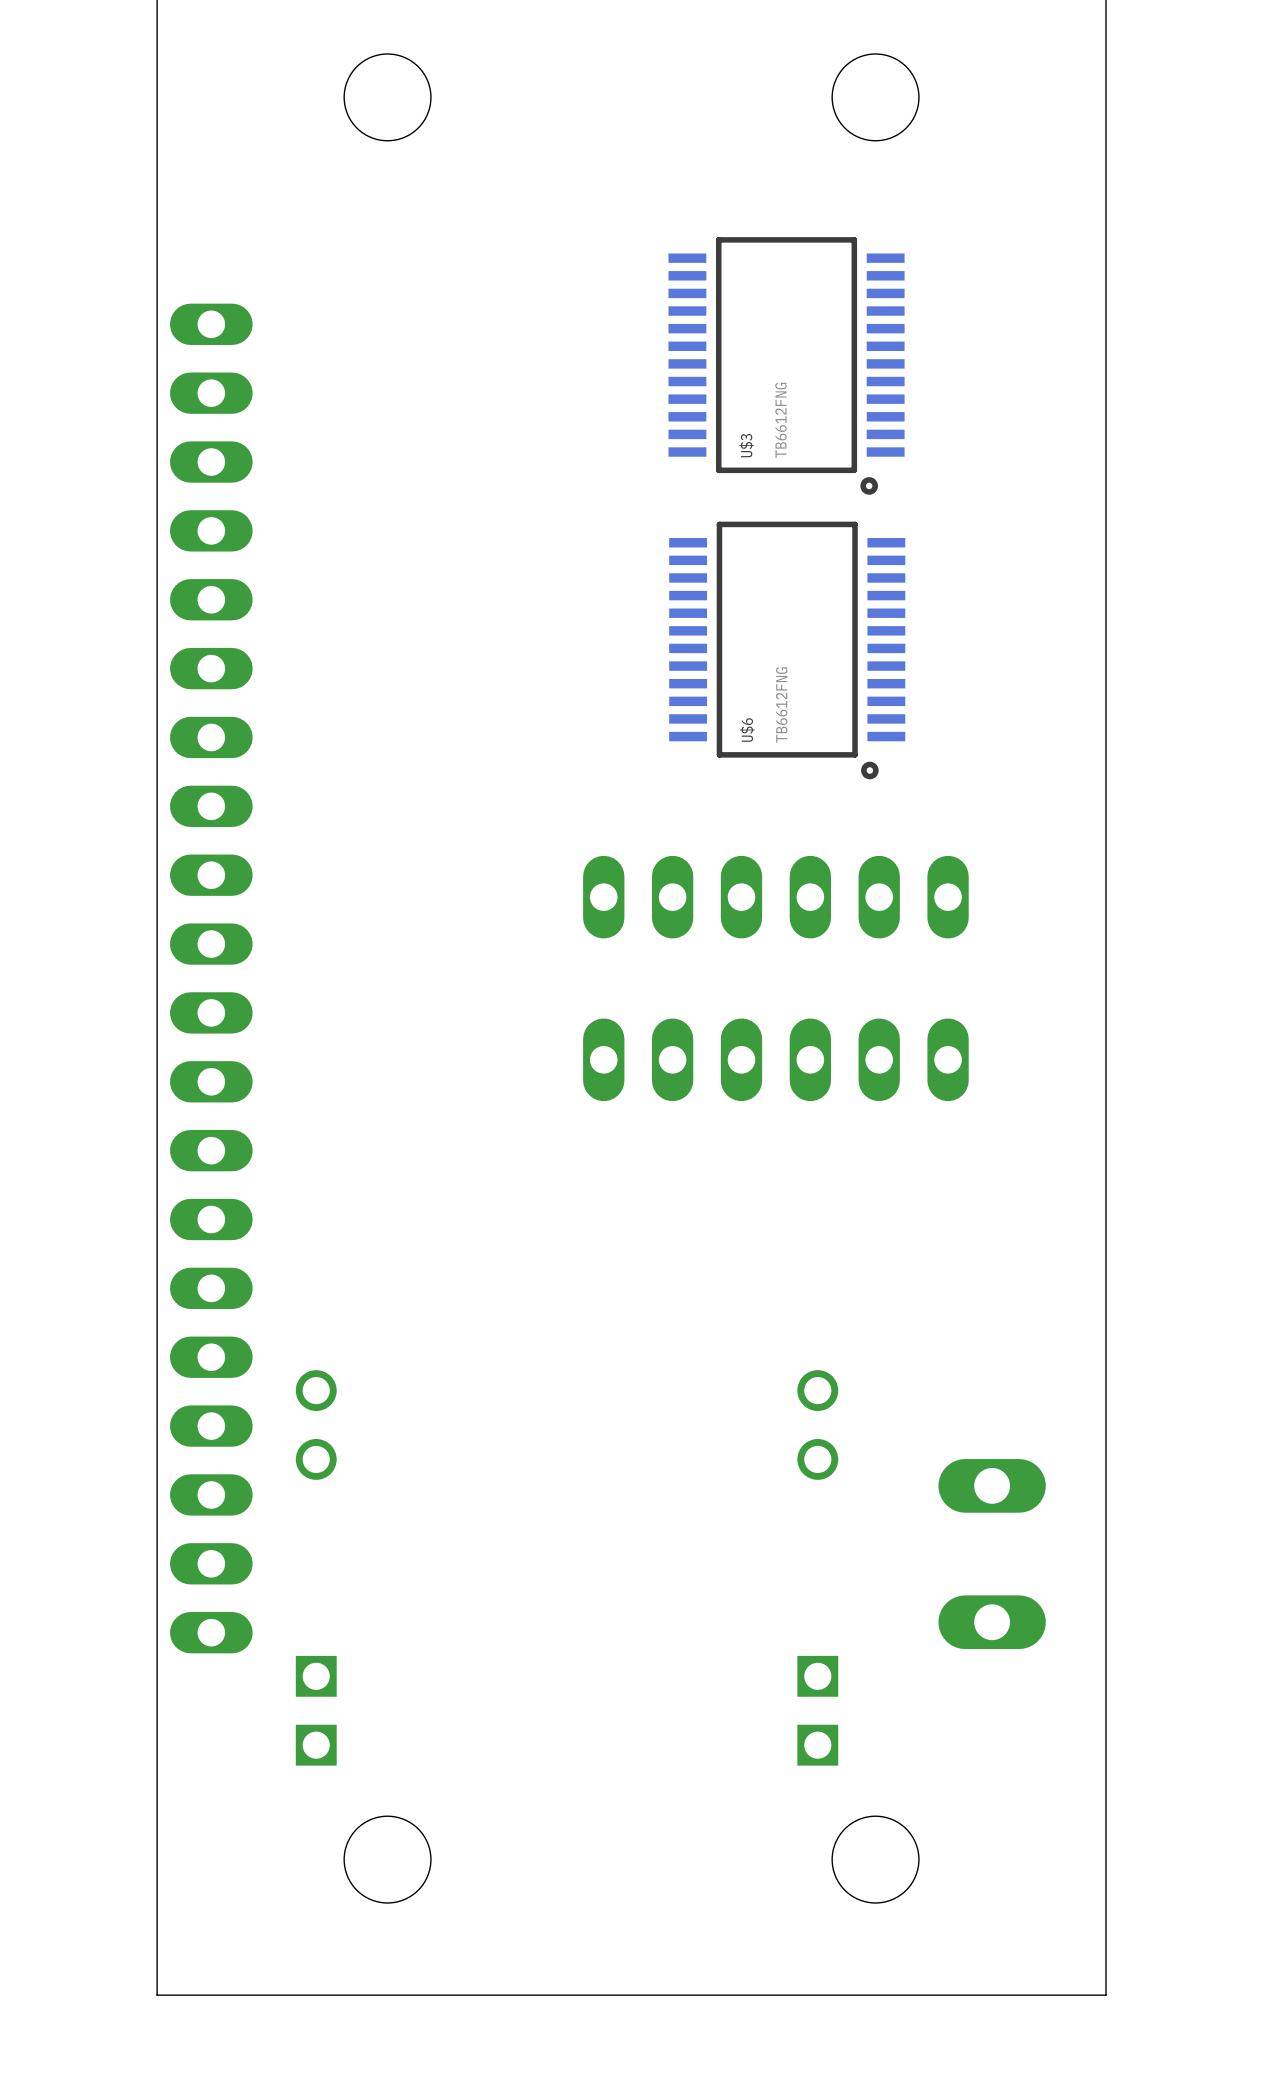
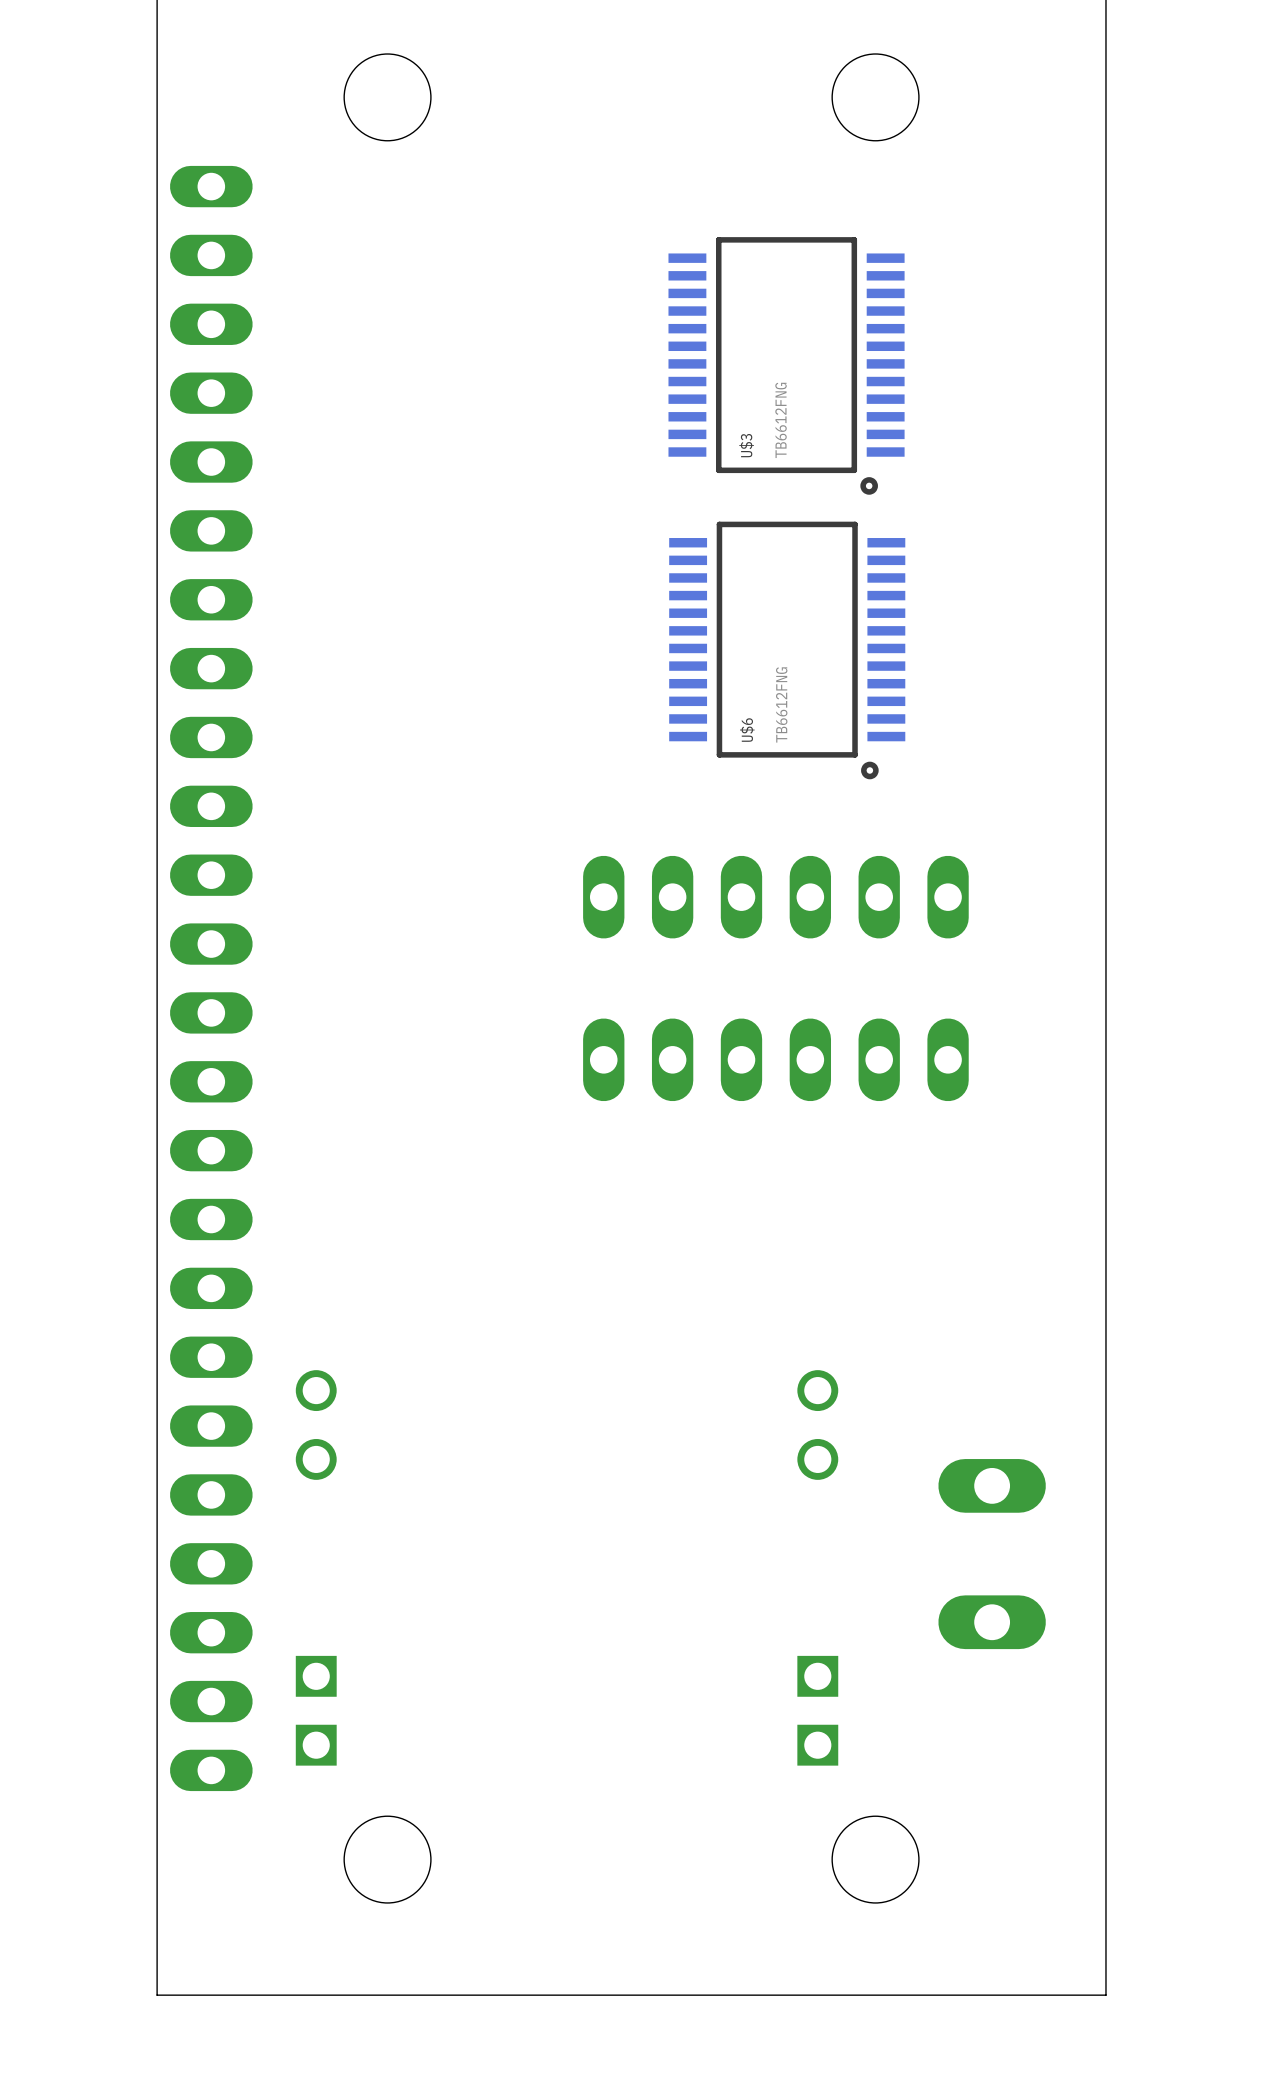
part footprint: [170, 303, 253, 1654] -> [170, 165, 253, 1792]

